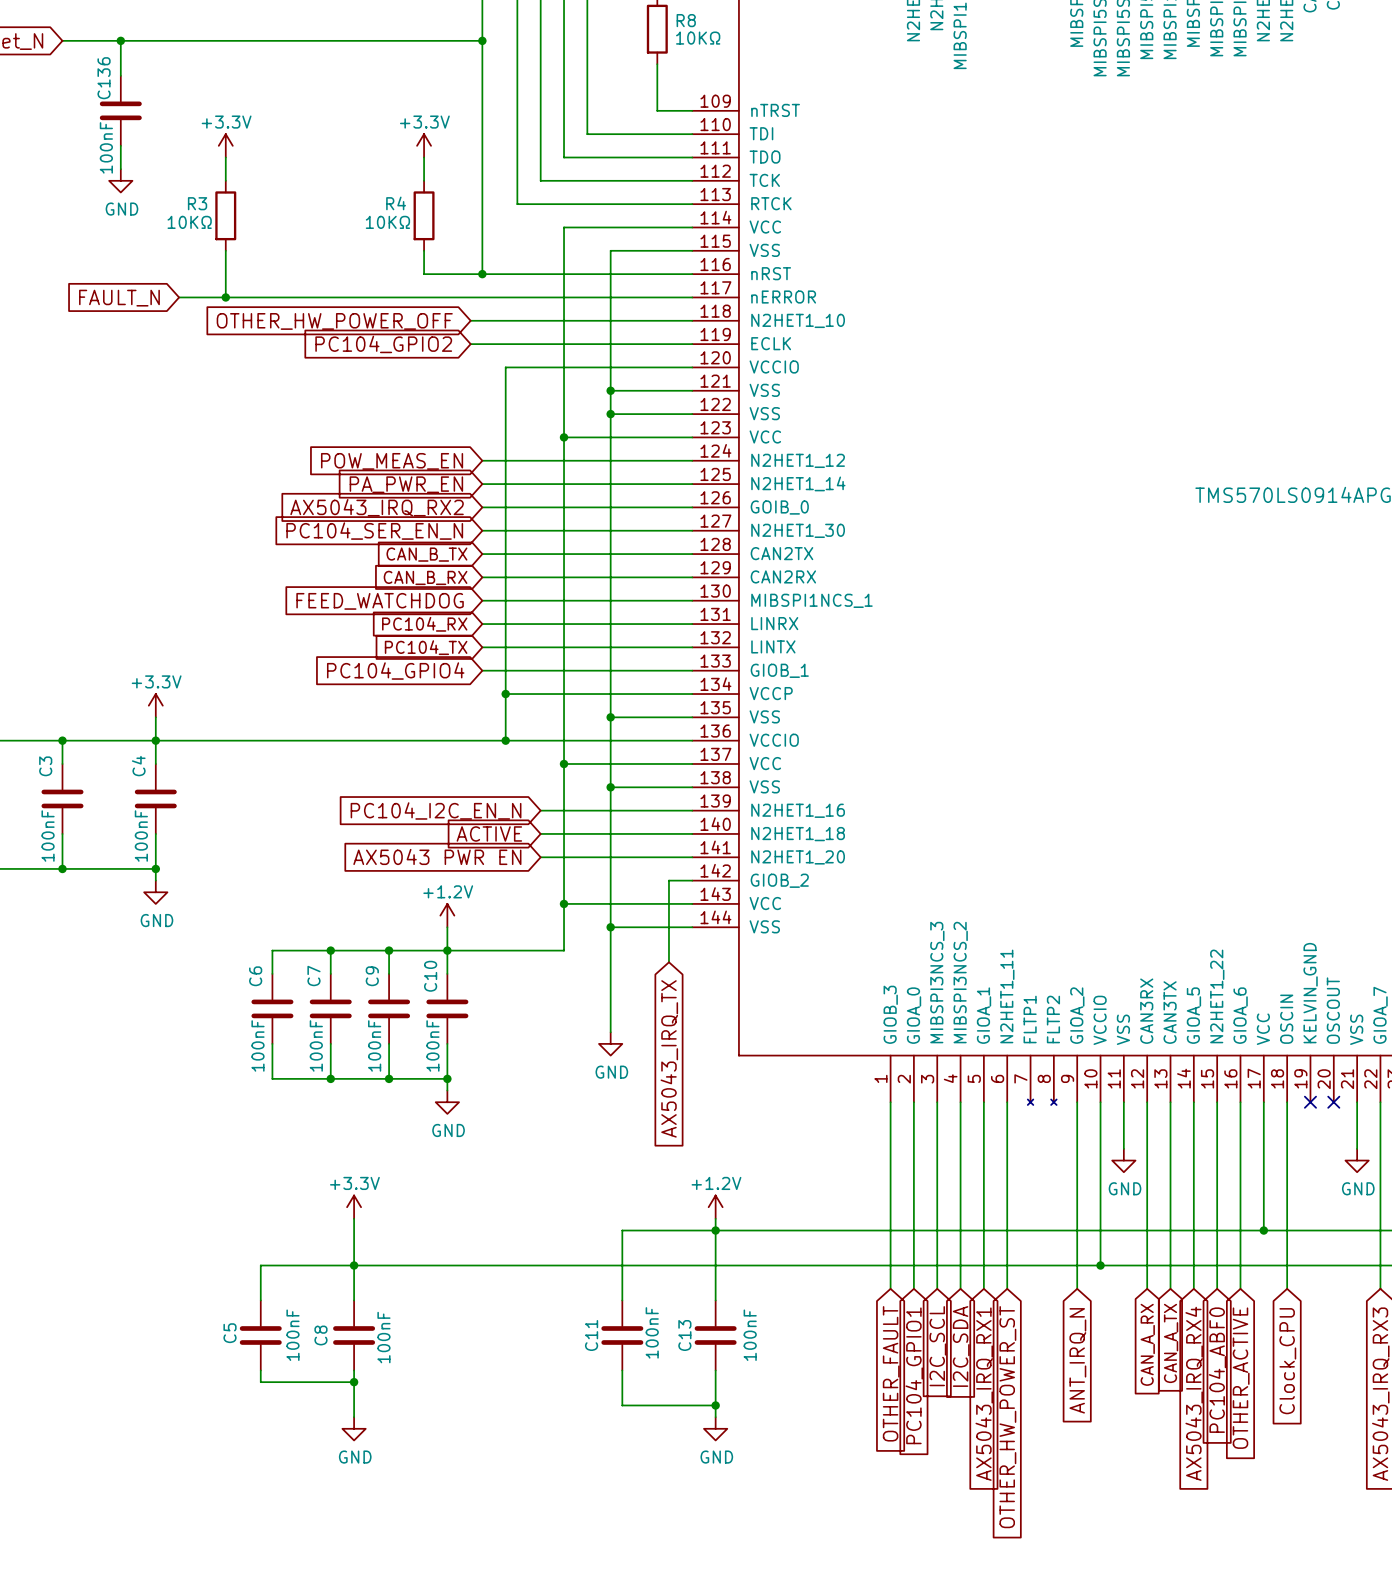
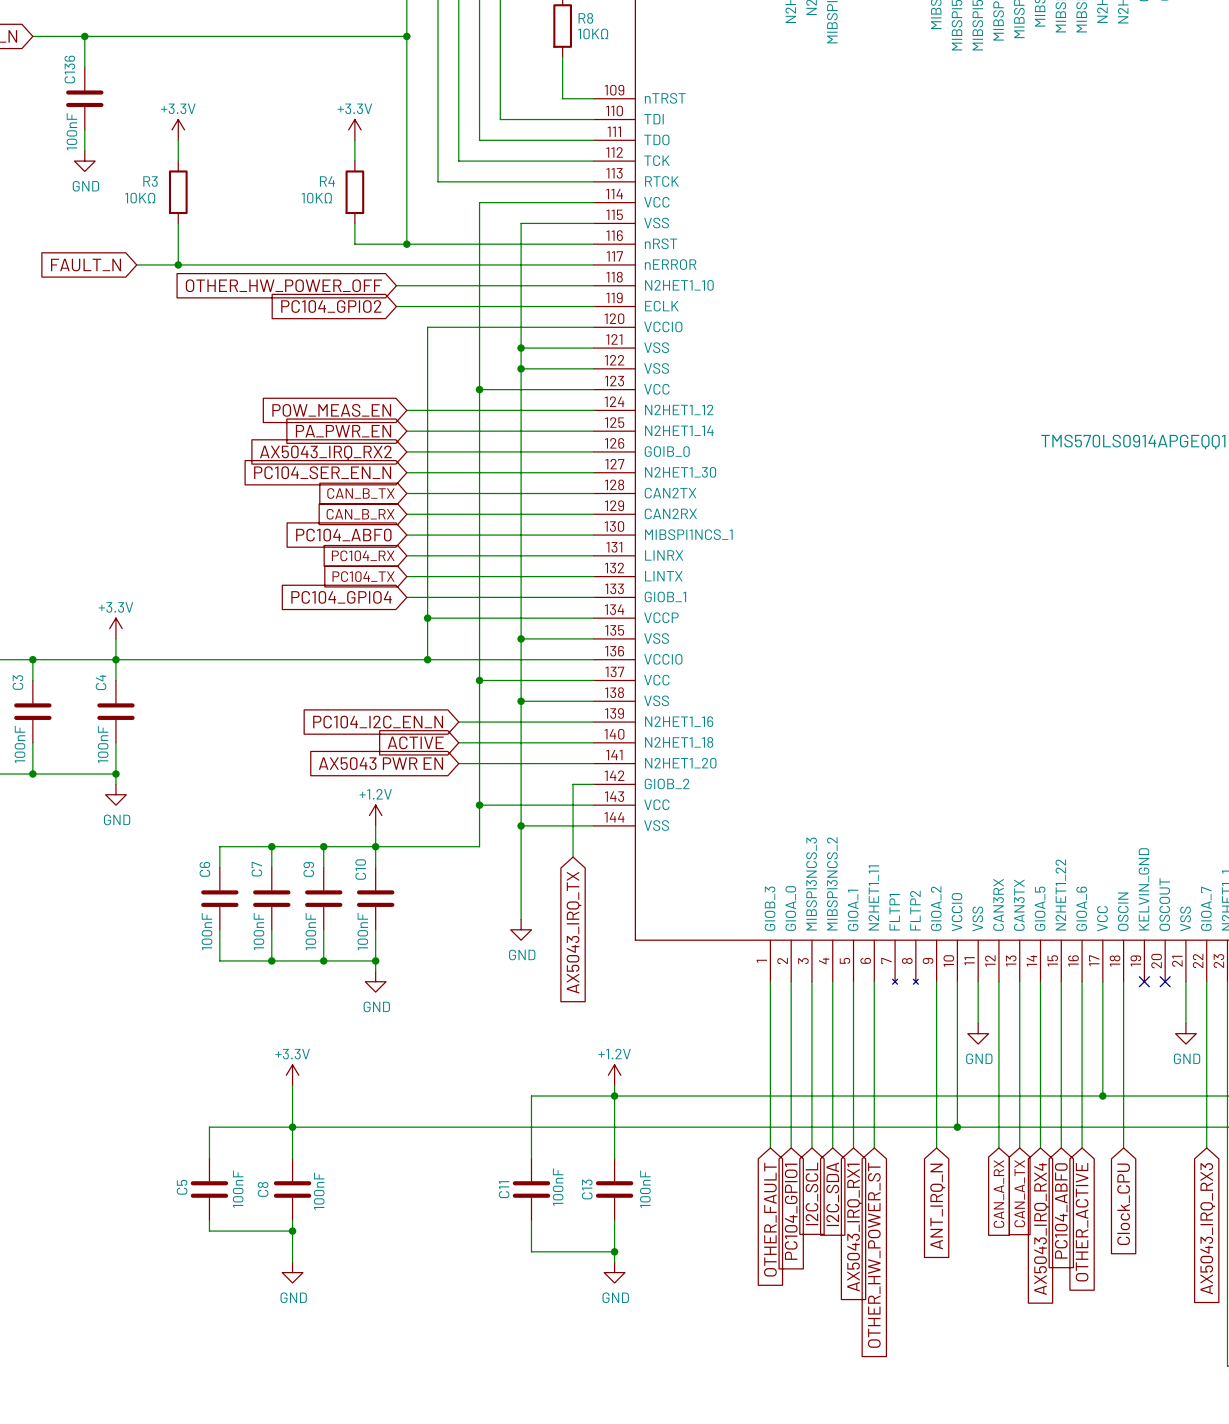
global label: FEED_WATCHDOG (380, 601) -> PC104_ABF0 (343, 535)

